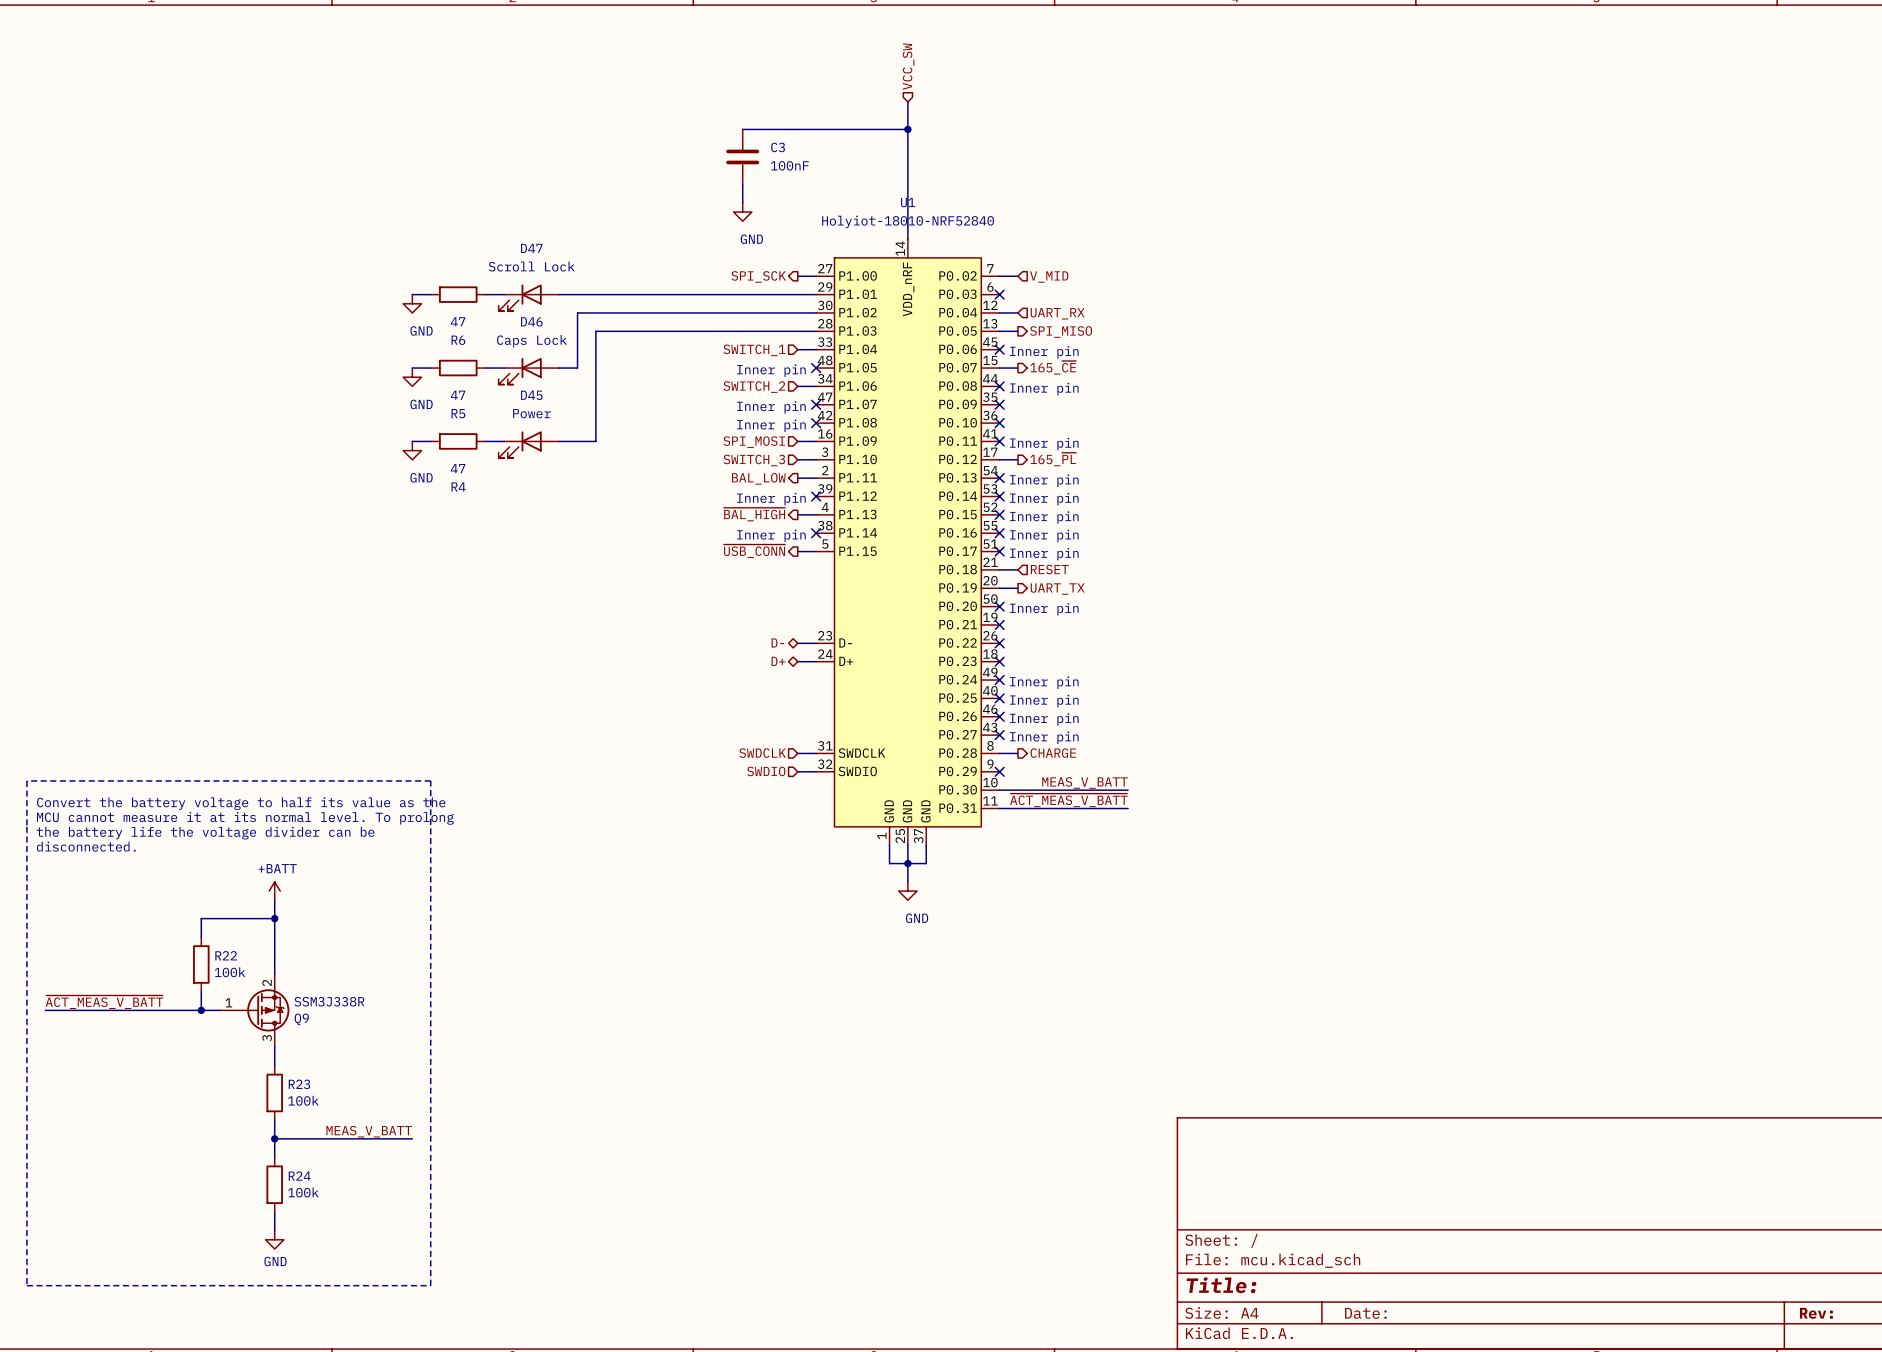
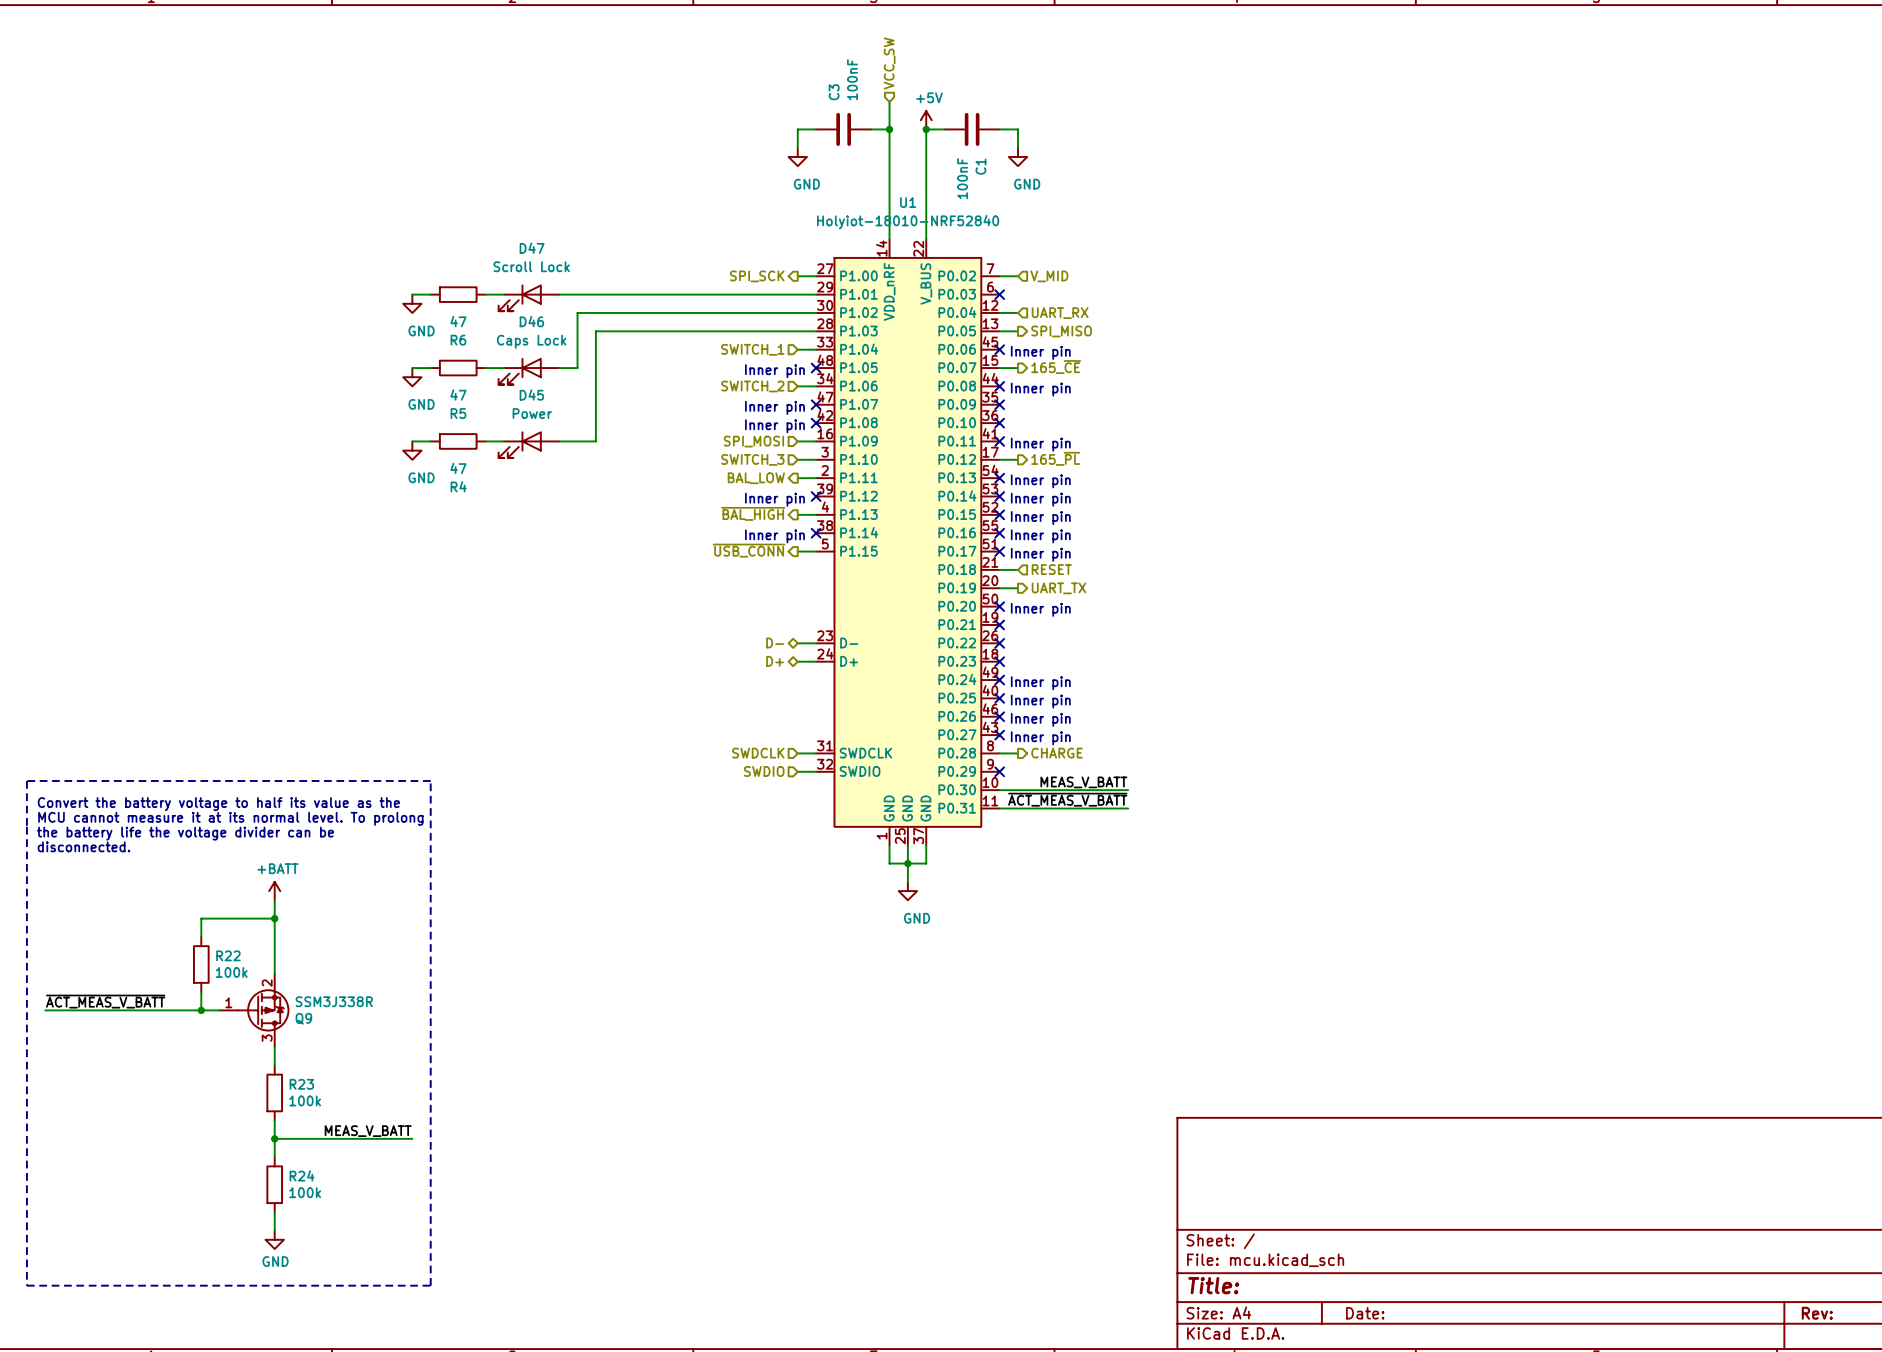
hierarchical label position: VCC_SW (908, 66) -> VCC_SW (889, 63)
wire: (907, 101) (907, 239) -> (889, 101) (889, 239)
power symbol: none -> +5V (926, 120)
wire: (742, 129) (797, 129) -> (797, 147) (797, 129)
wire: (889, 129) (907, 129) -> none
junction: none -> (889, 129)
junction: (907, 129) -> none
junction: none -> (926, 129)
wire: none -> (944, 129) (926, 129) (926, 239)
C1: none -> 100nF (972, 129)
wire: none -> (999, 129) (1018, 129) (1018, 147)
C3 name position: C3 (778, 147) -> C3 (834, 92)
C3 rotation: 0° (742, 156) -> 90° clockwise (843, 129)
C3 position: (742, 156) -> (843, 129)
power symbol: none -> GND (1018, 156)
C3 value position: 100nF (789, 165) -> 100nF (852, 79)
wire: (742, 184) (742, 202) -> none
power symbol position: GND (742, 212) -> GND (797, 156)
U1 symbol: [816, 239, 1000, 846] -> [816, 239, 1000, 846]

